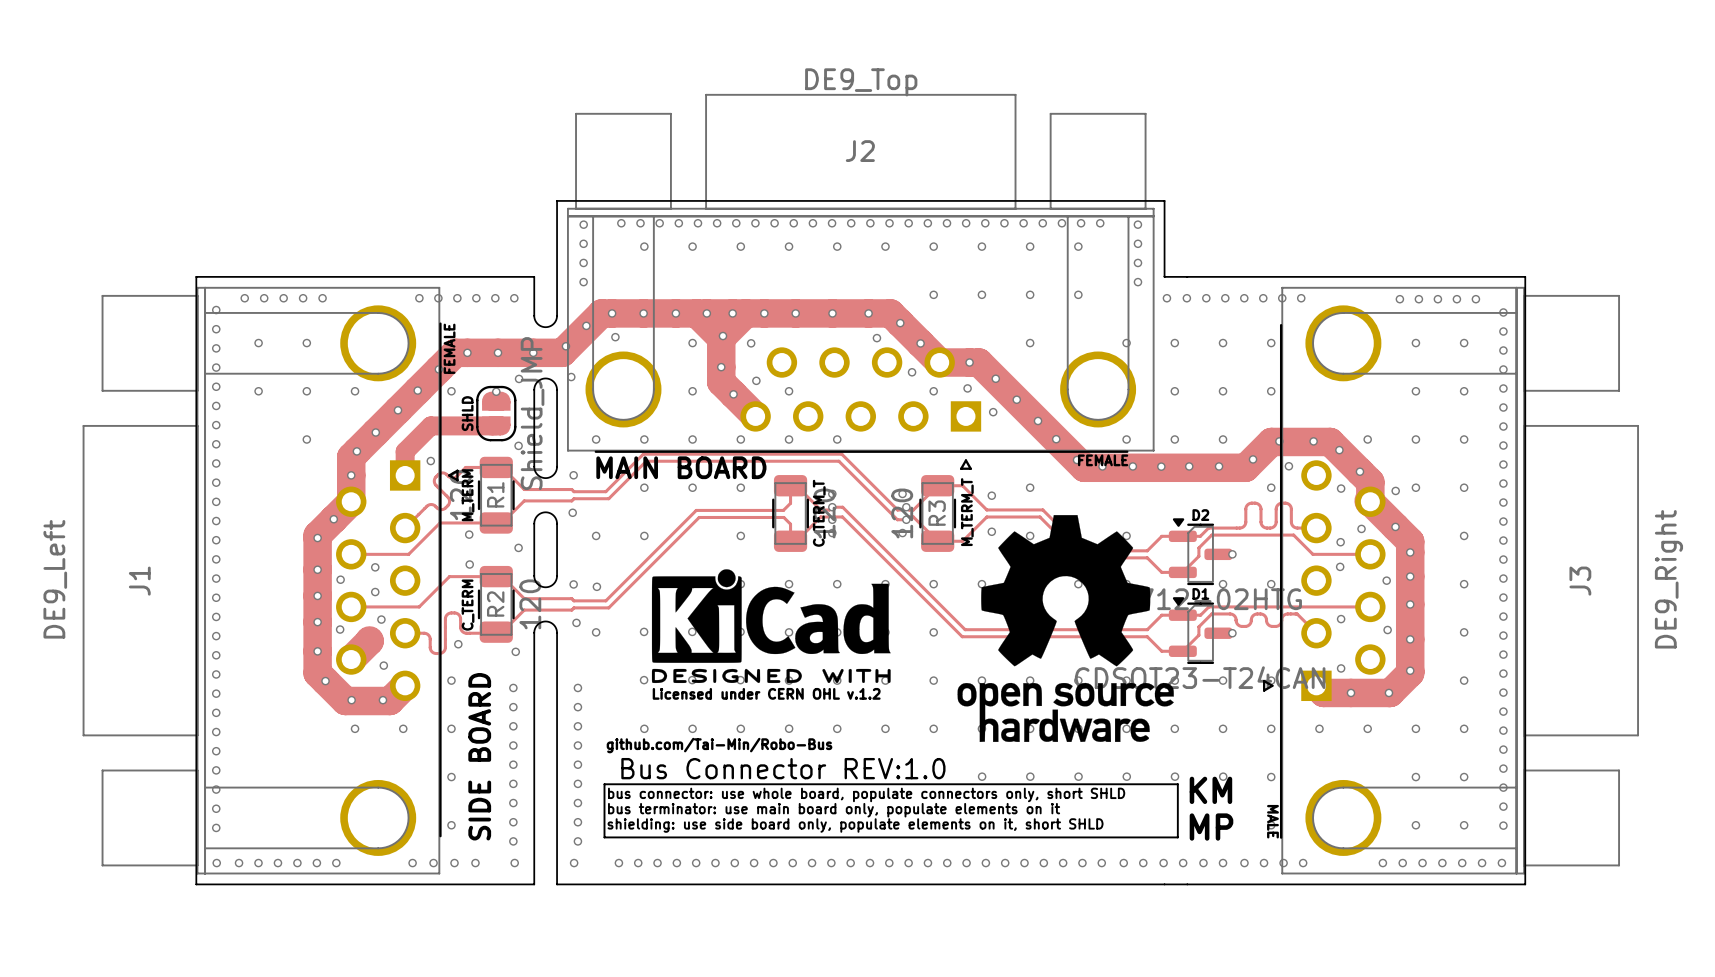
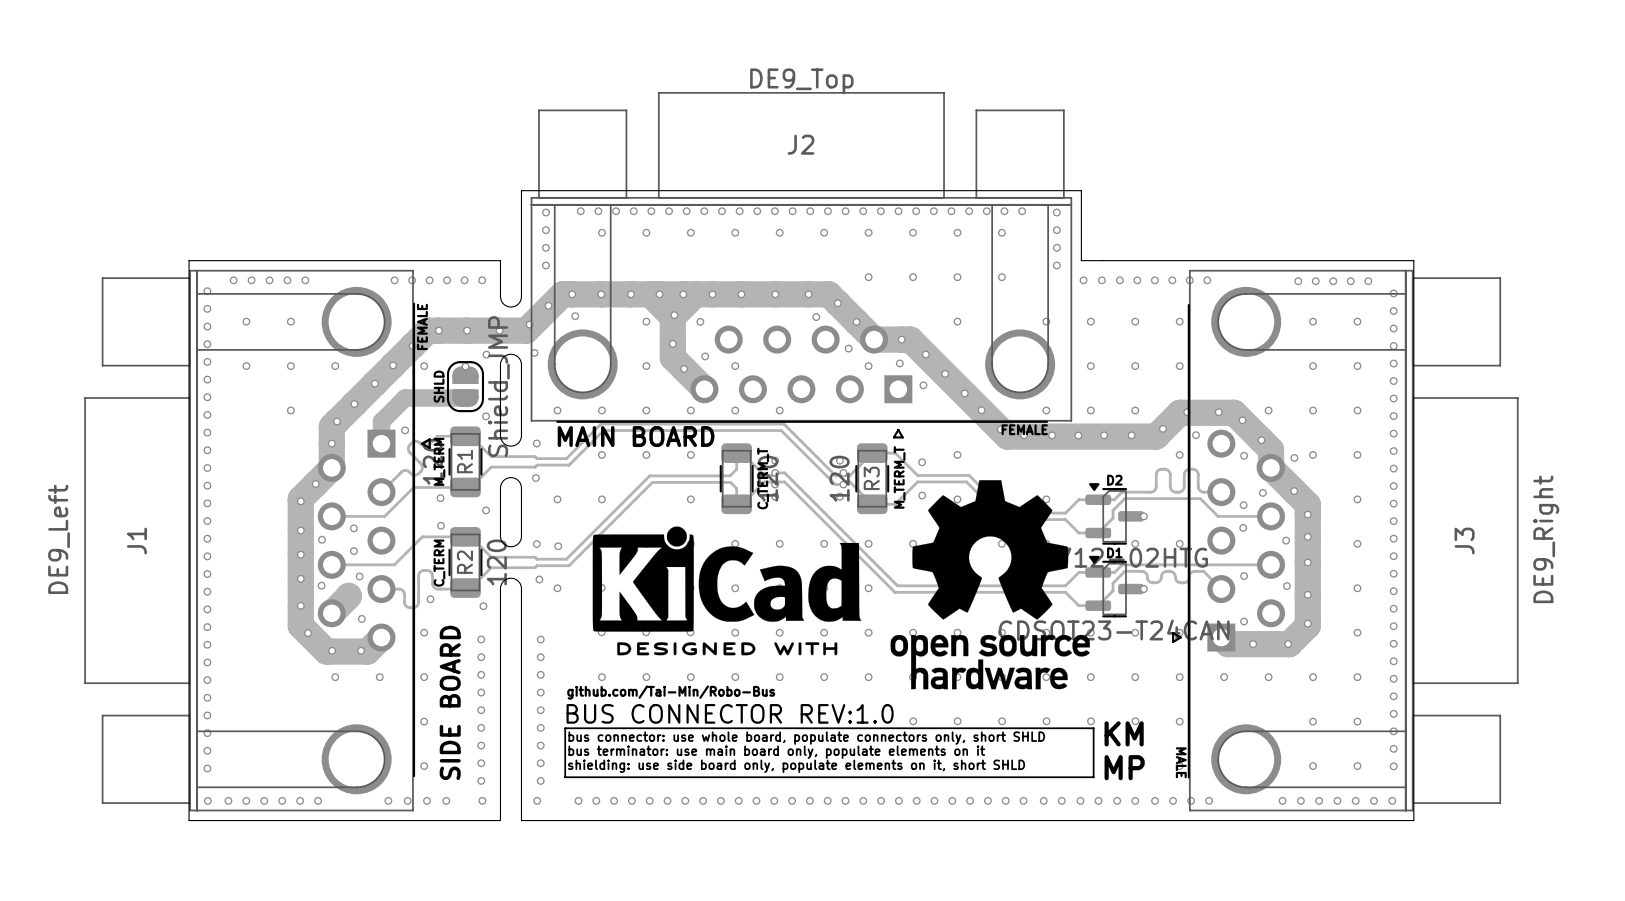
drawing shape: [651, 569, 891, 684] -> [592, 526, 862, 656]
text: Licensed under CERN OHL v.1.2 (766, 693) -> none
text: Bus Connector REV:1.0 (783, 768) -> BUS CONNECTOR REV:1.0 (730, 713)

